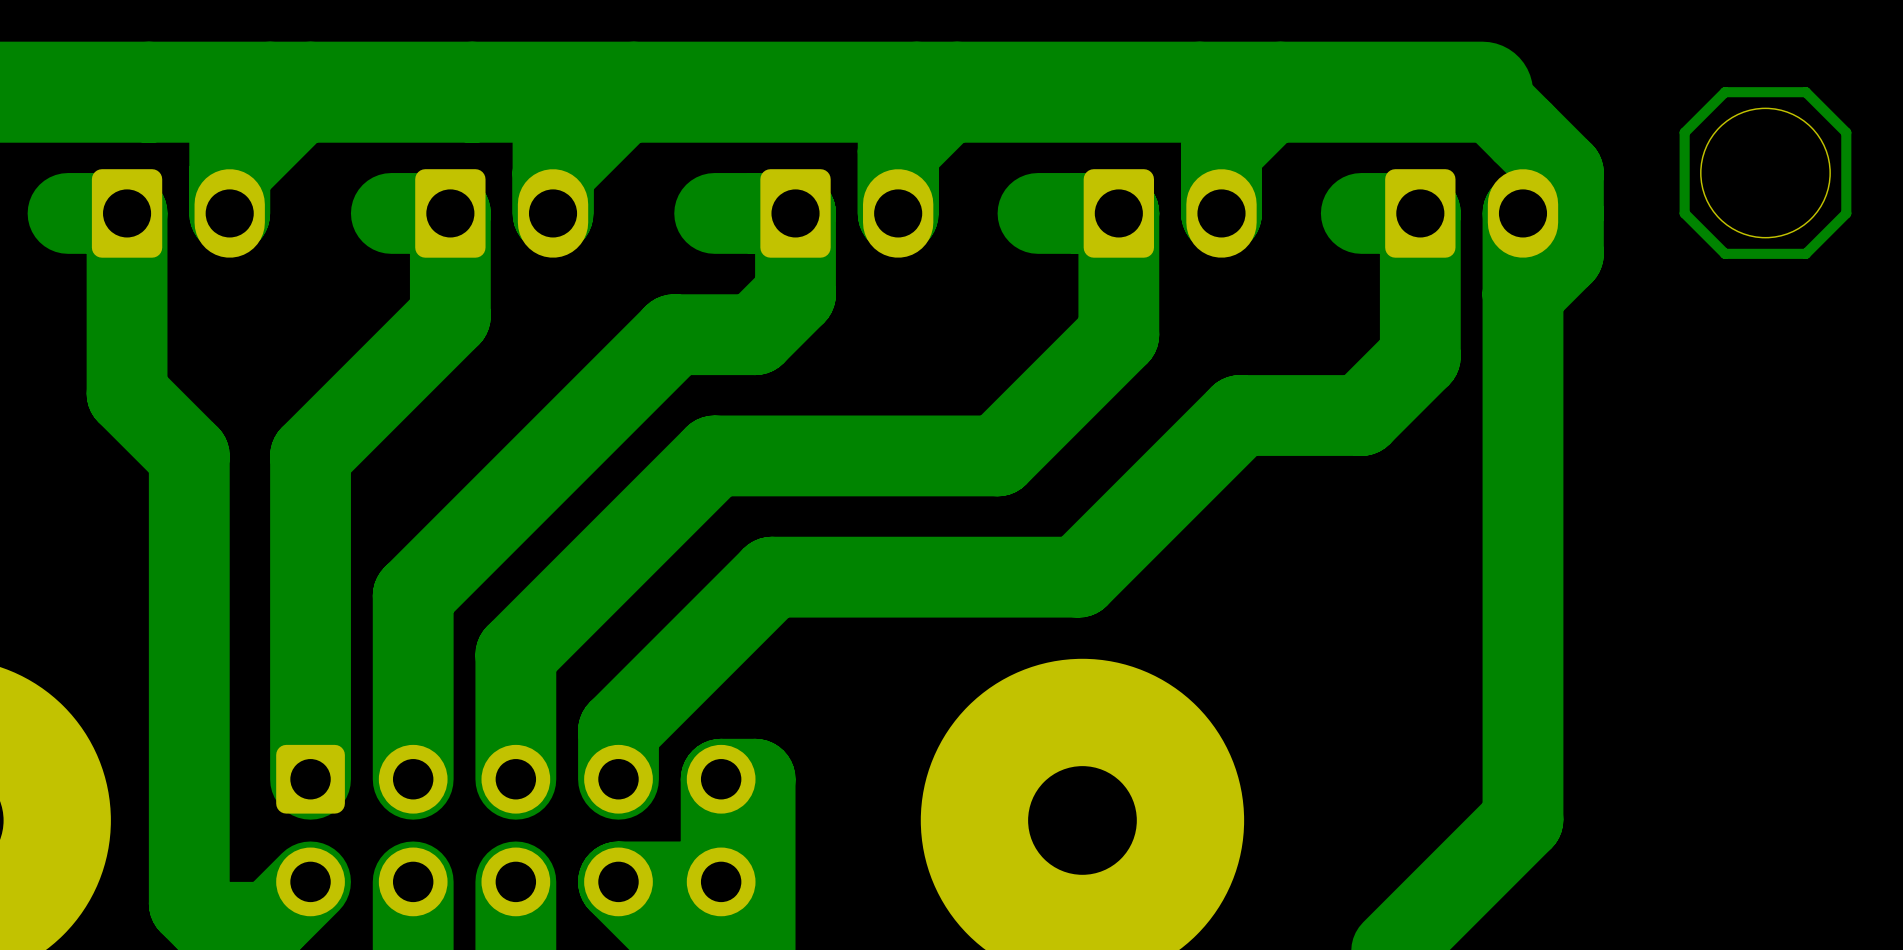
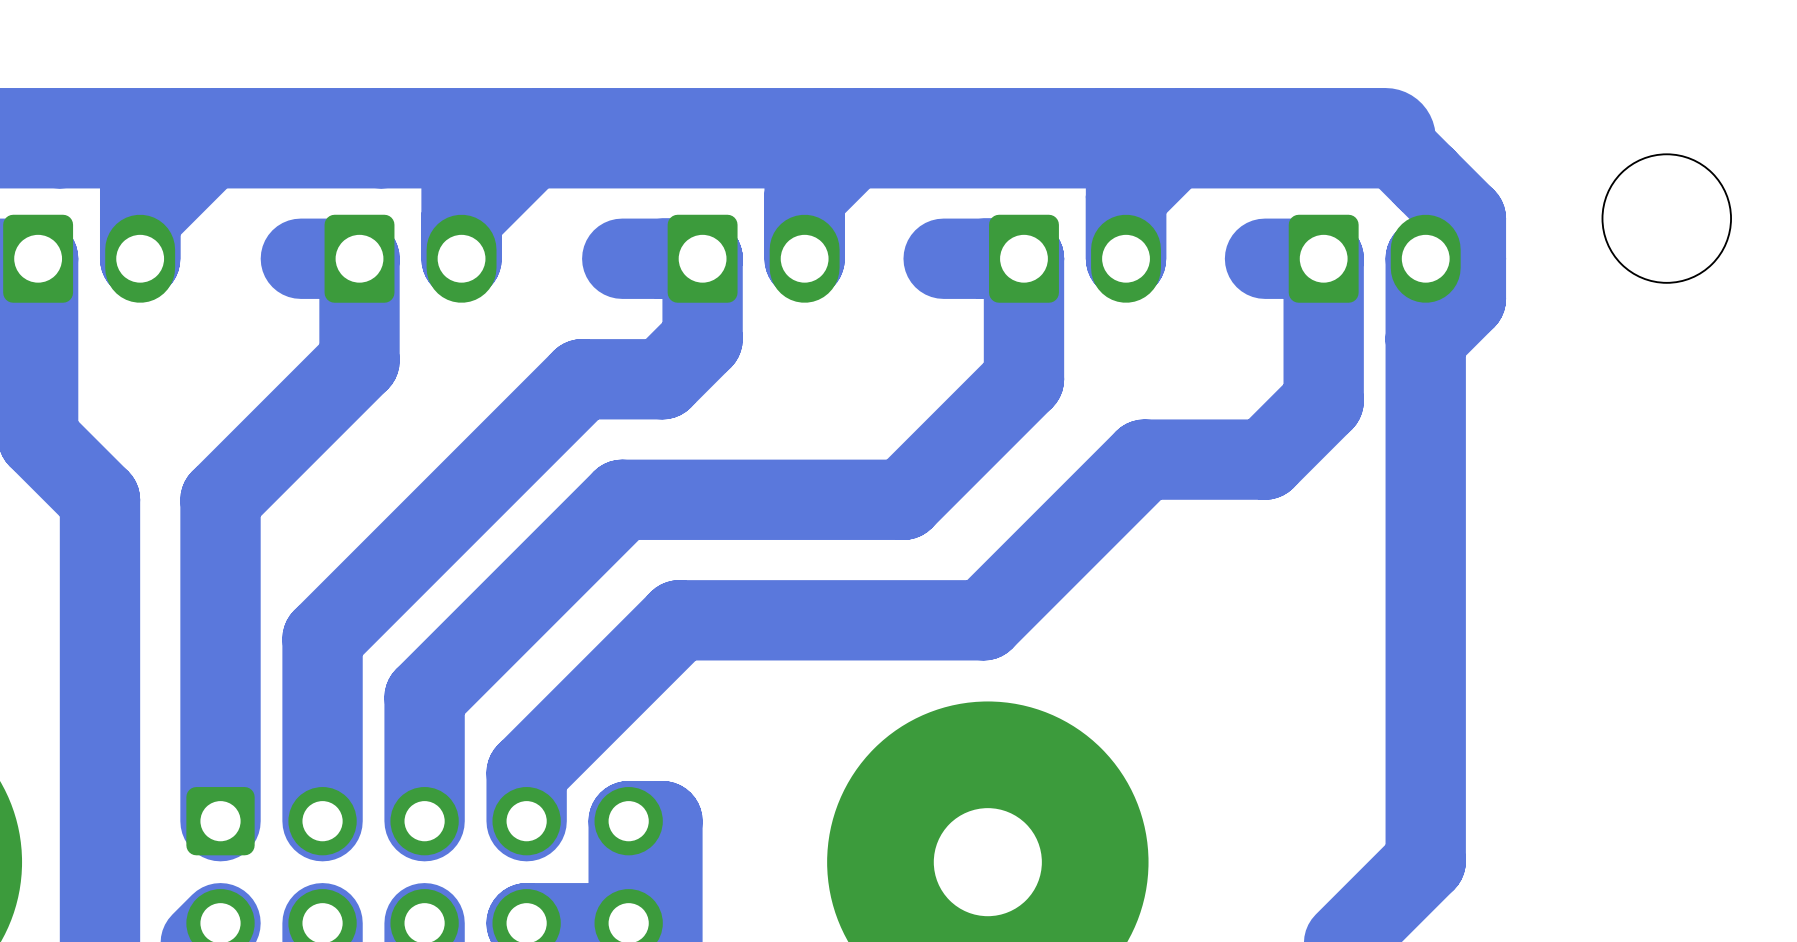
bottom track: (1805, 92) (1725, 92) (1684, 132) (1684, 213) (1725, 253) (1805, 253) (1846, 213) (1846, 132) (1805, 92) -> none

